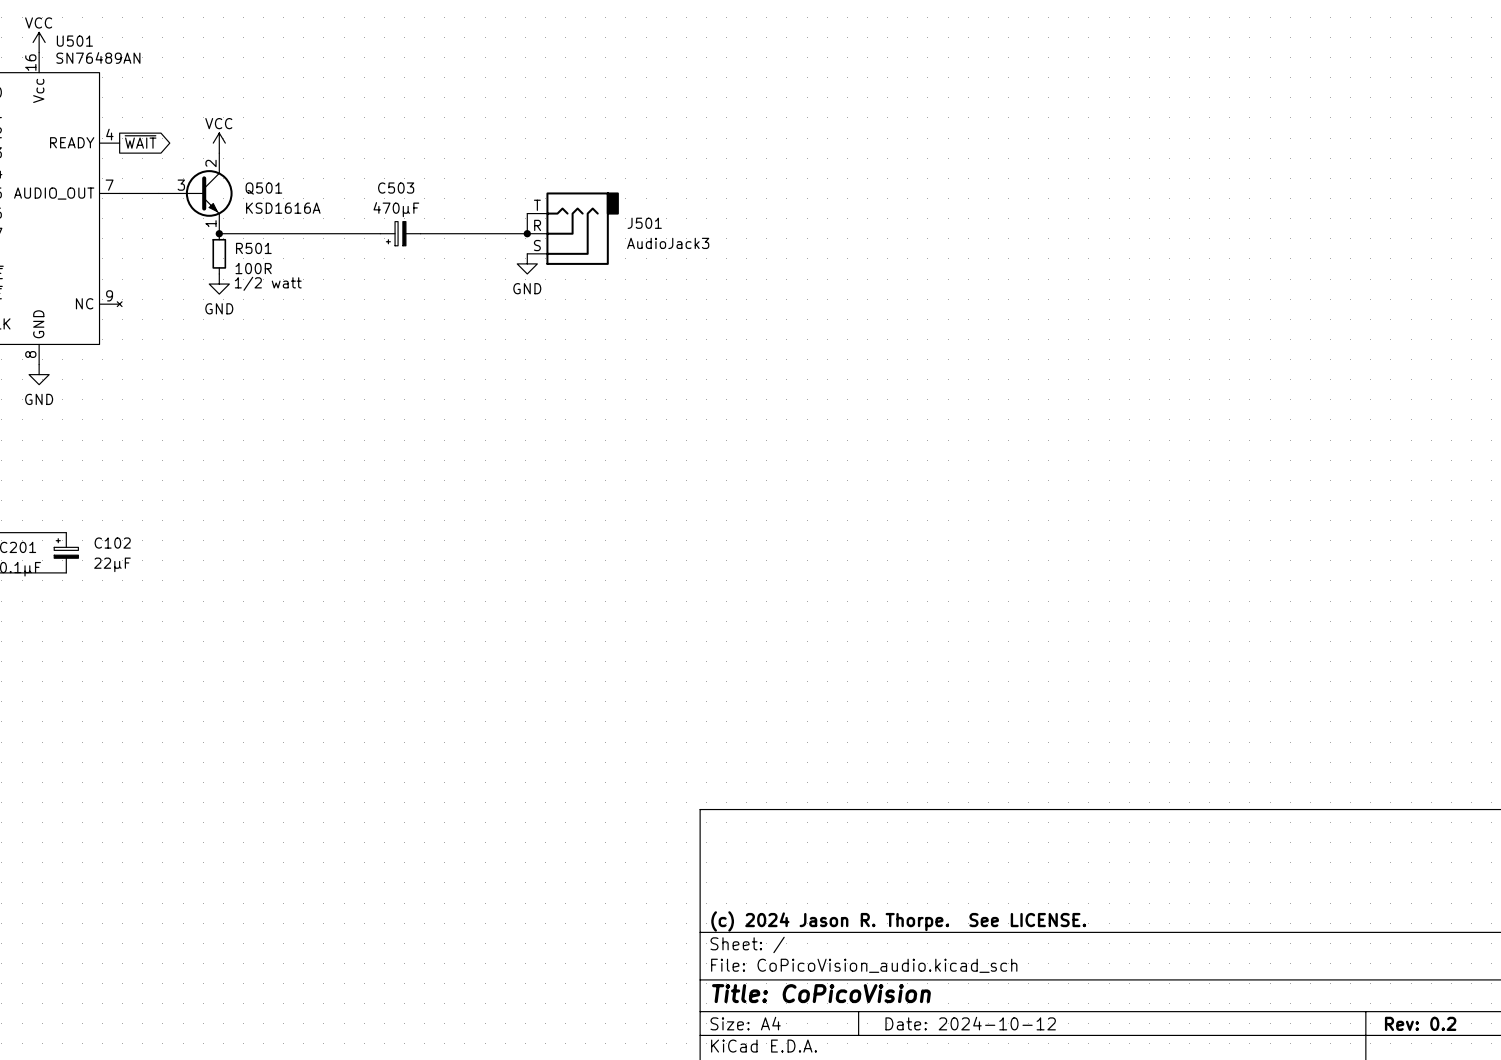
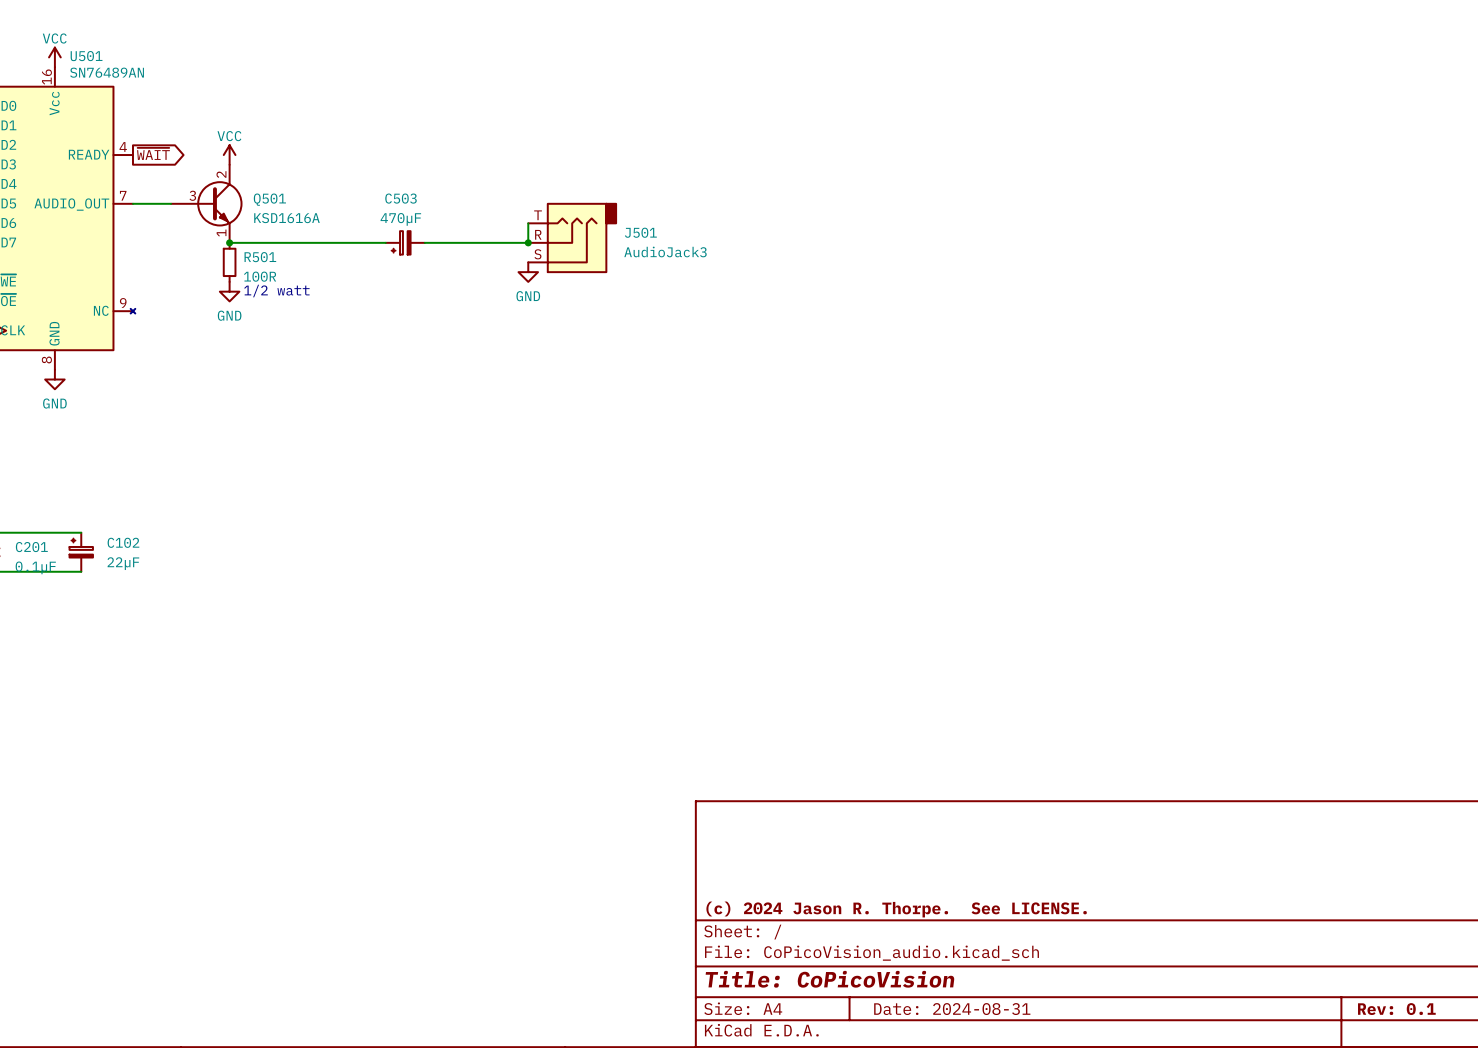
title block: Date: 2024-10-12 (970, 1023) -> Date: 2024-08-31 (952, 1009)
title block: Rev: 0.2 (1420, 1023) -> Rev: 0.1 (1396, 1009)

